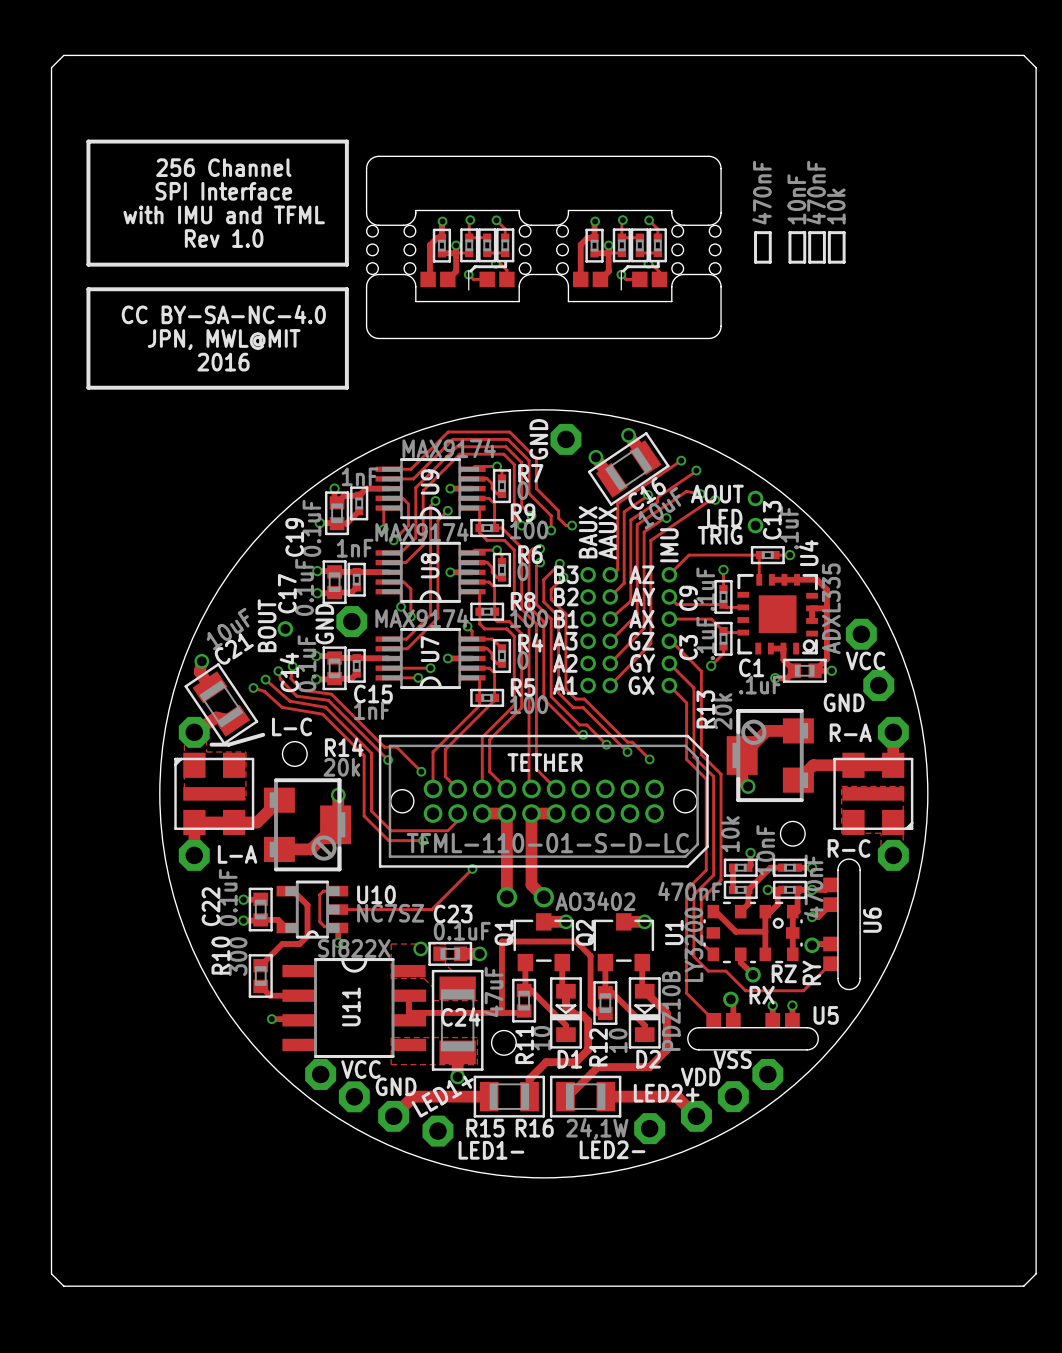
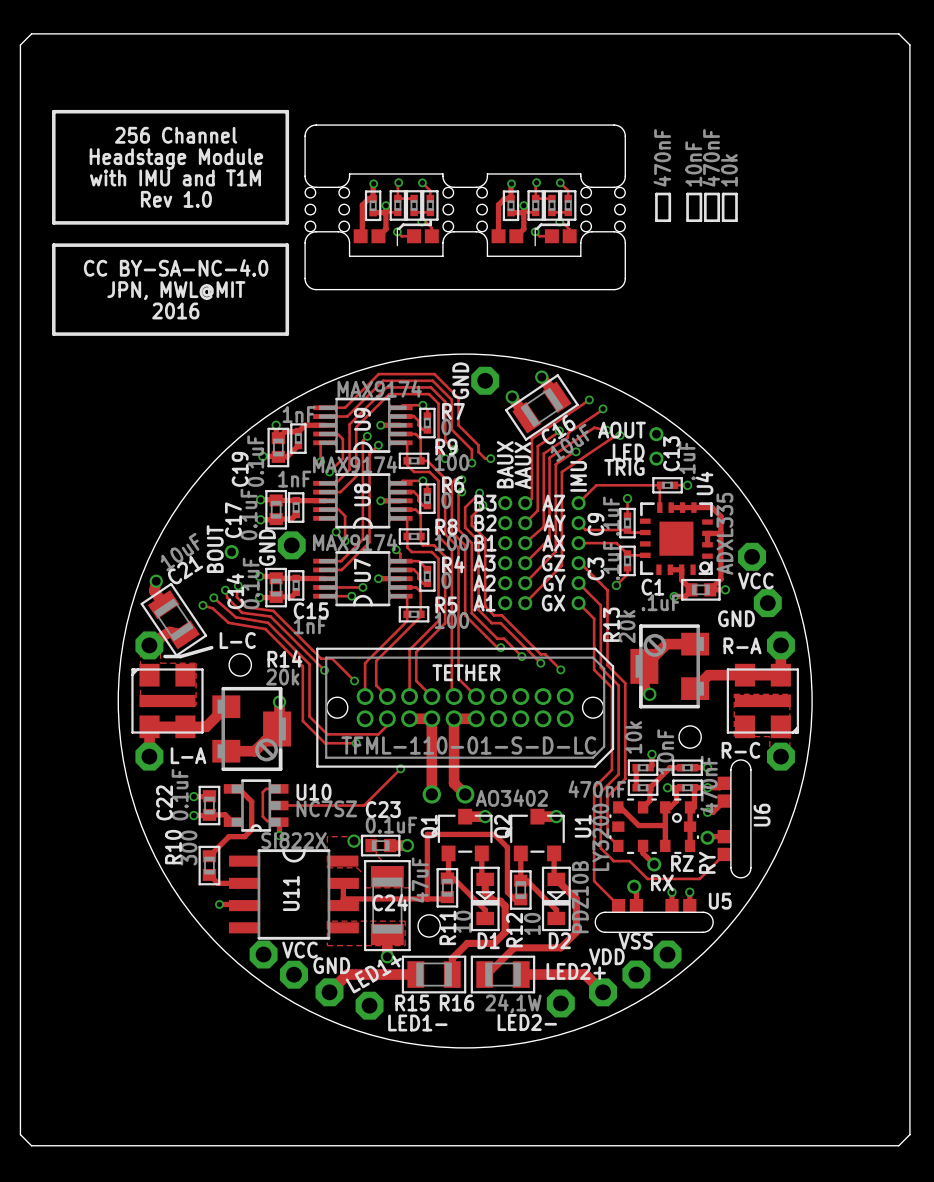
text: SPI Interface (223, 191) -> Headstage Module (176, 159)
text: with IMU and TFML (224, 214) -> with IMU and T1M (175, 177)

